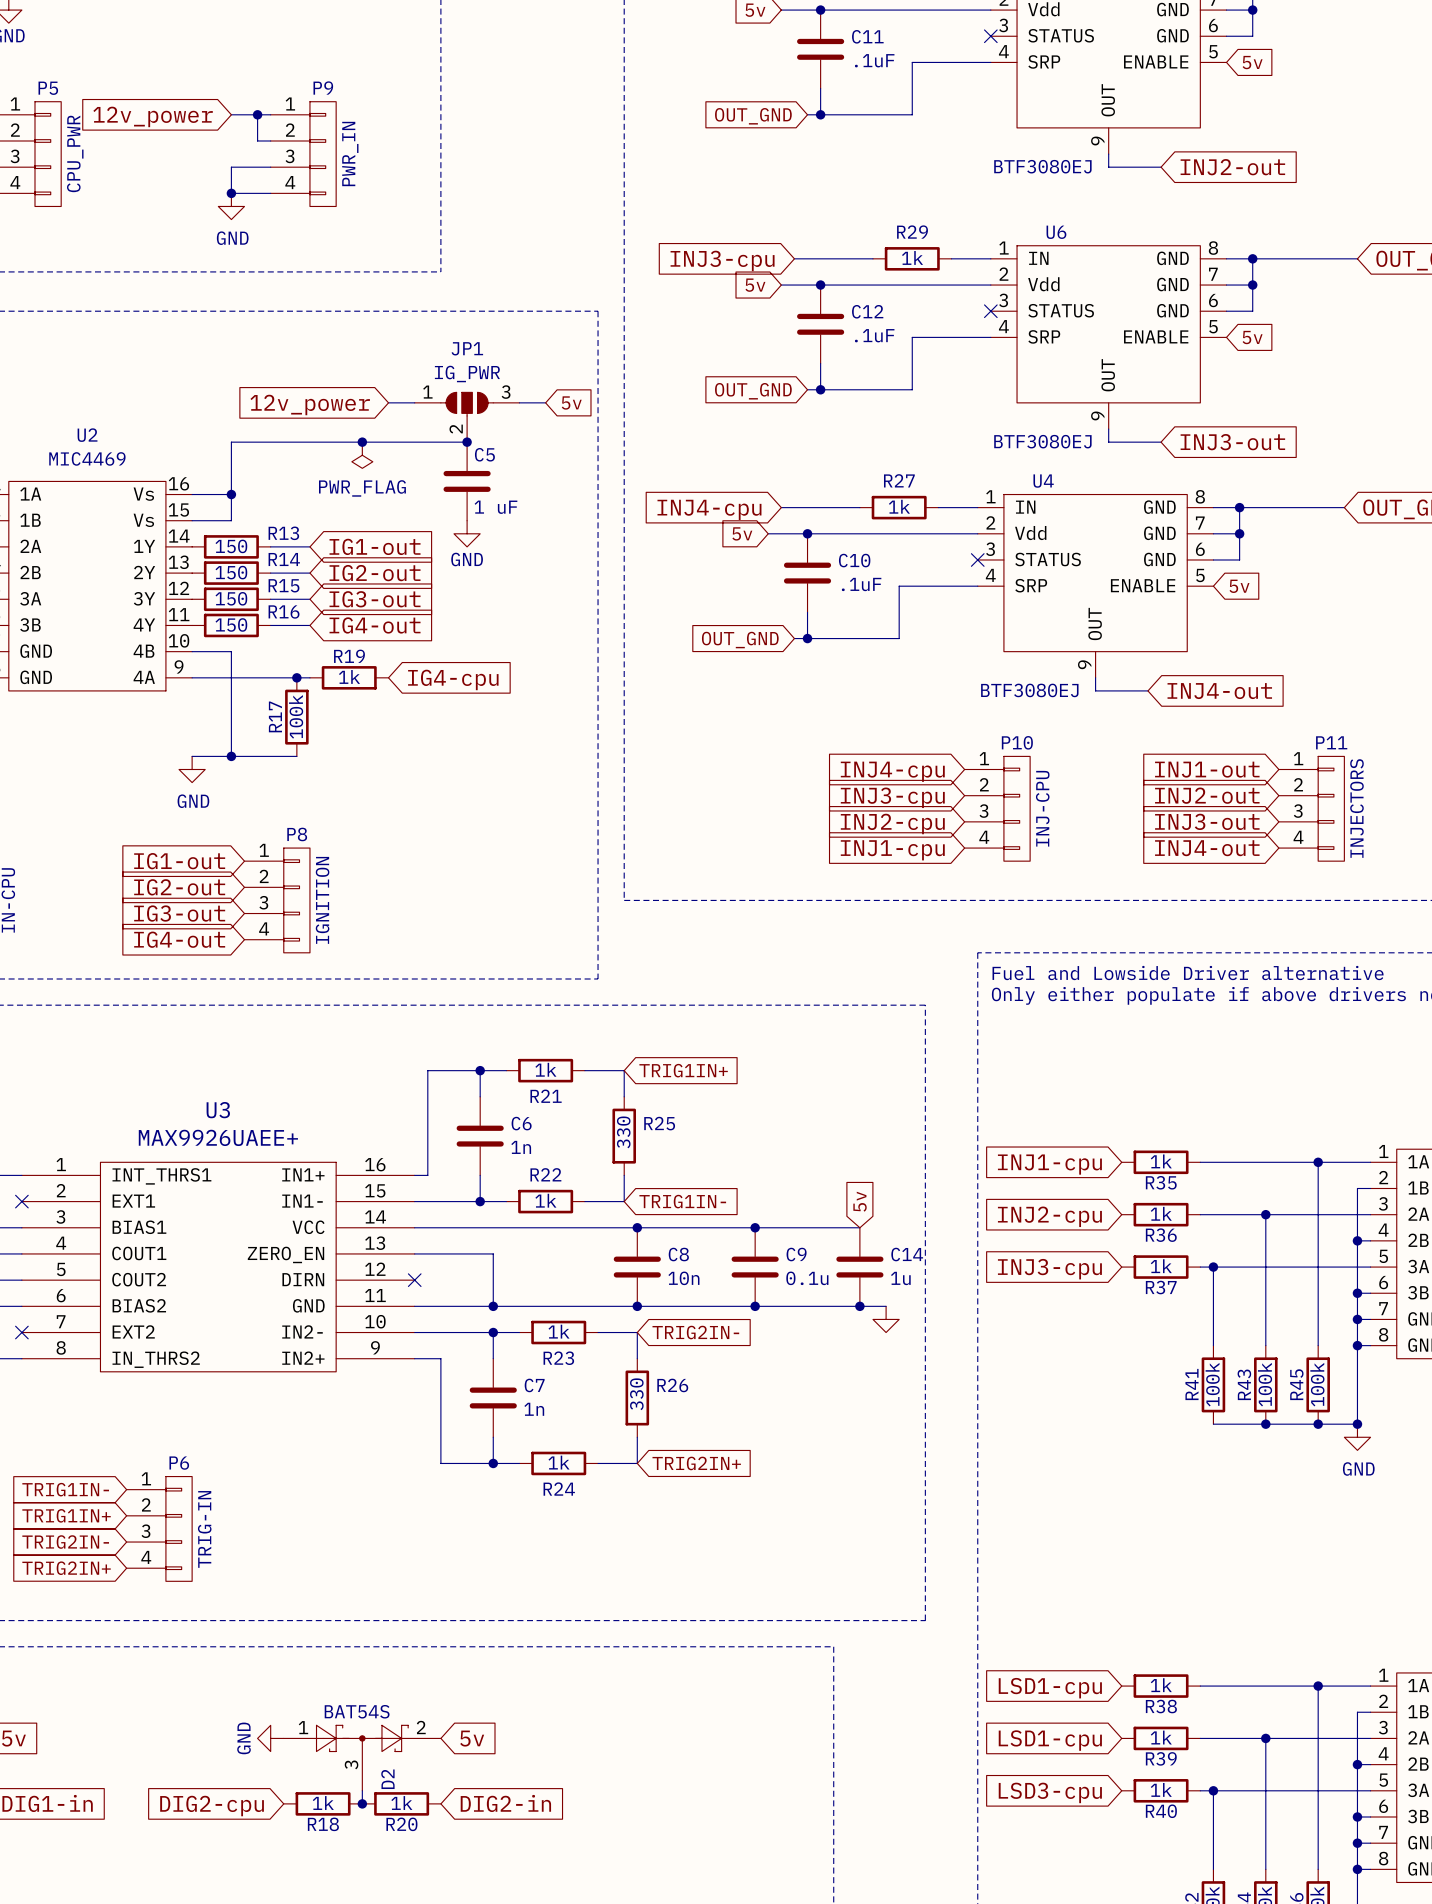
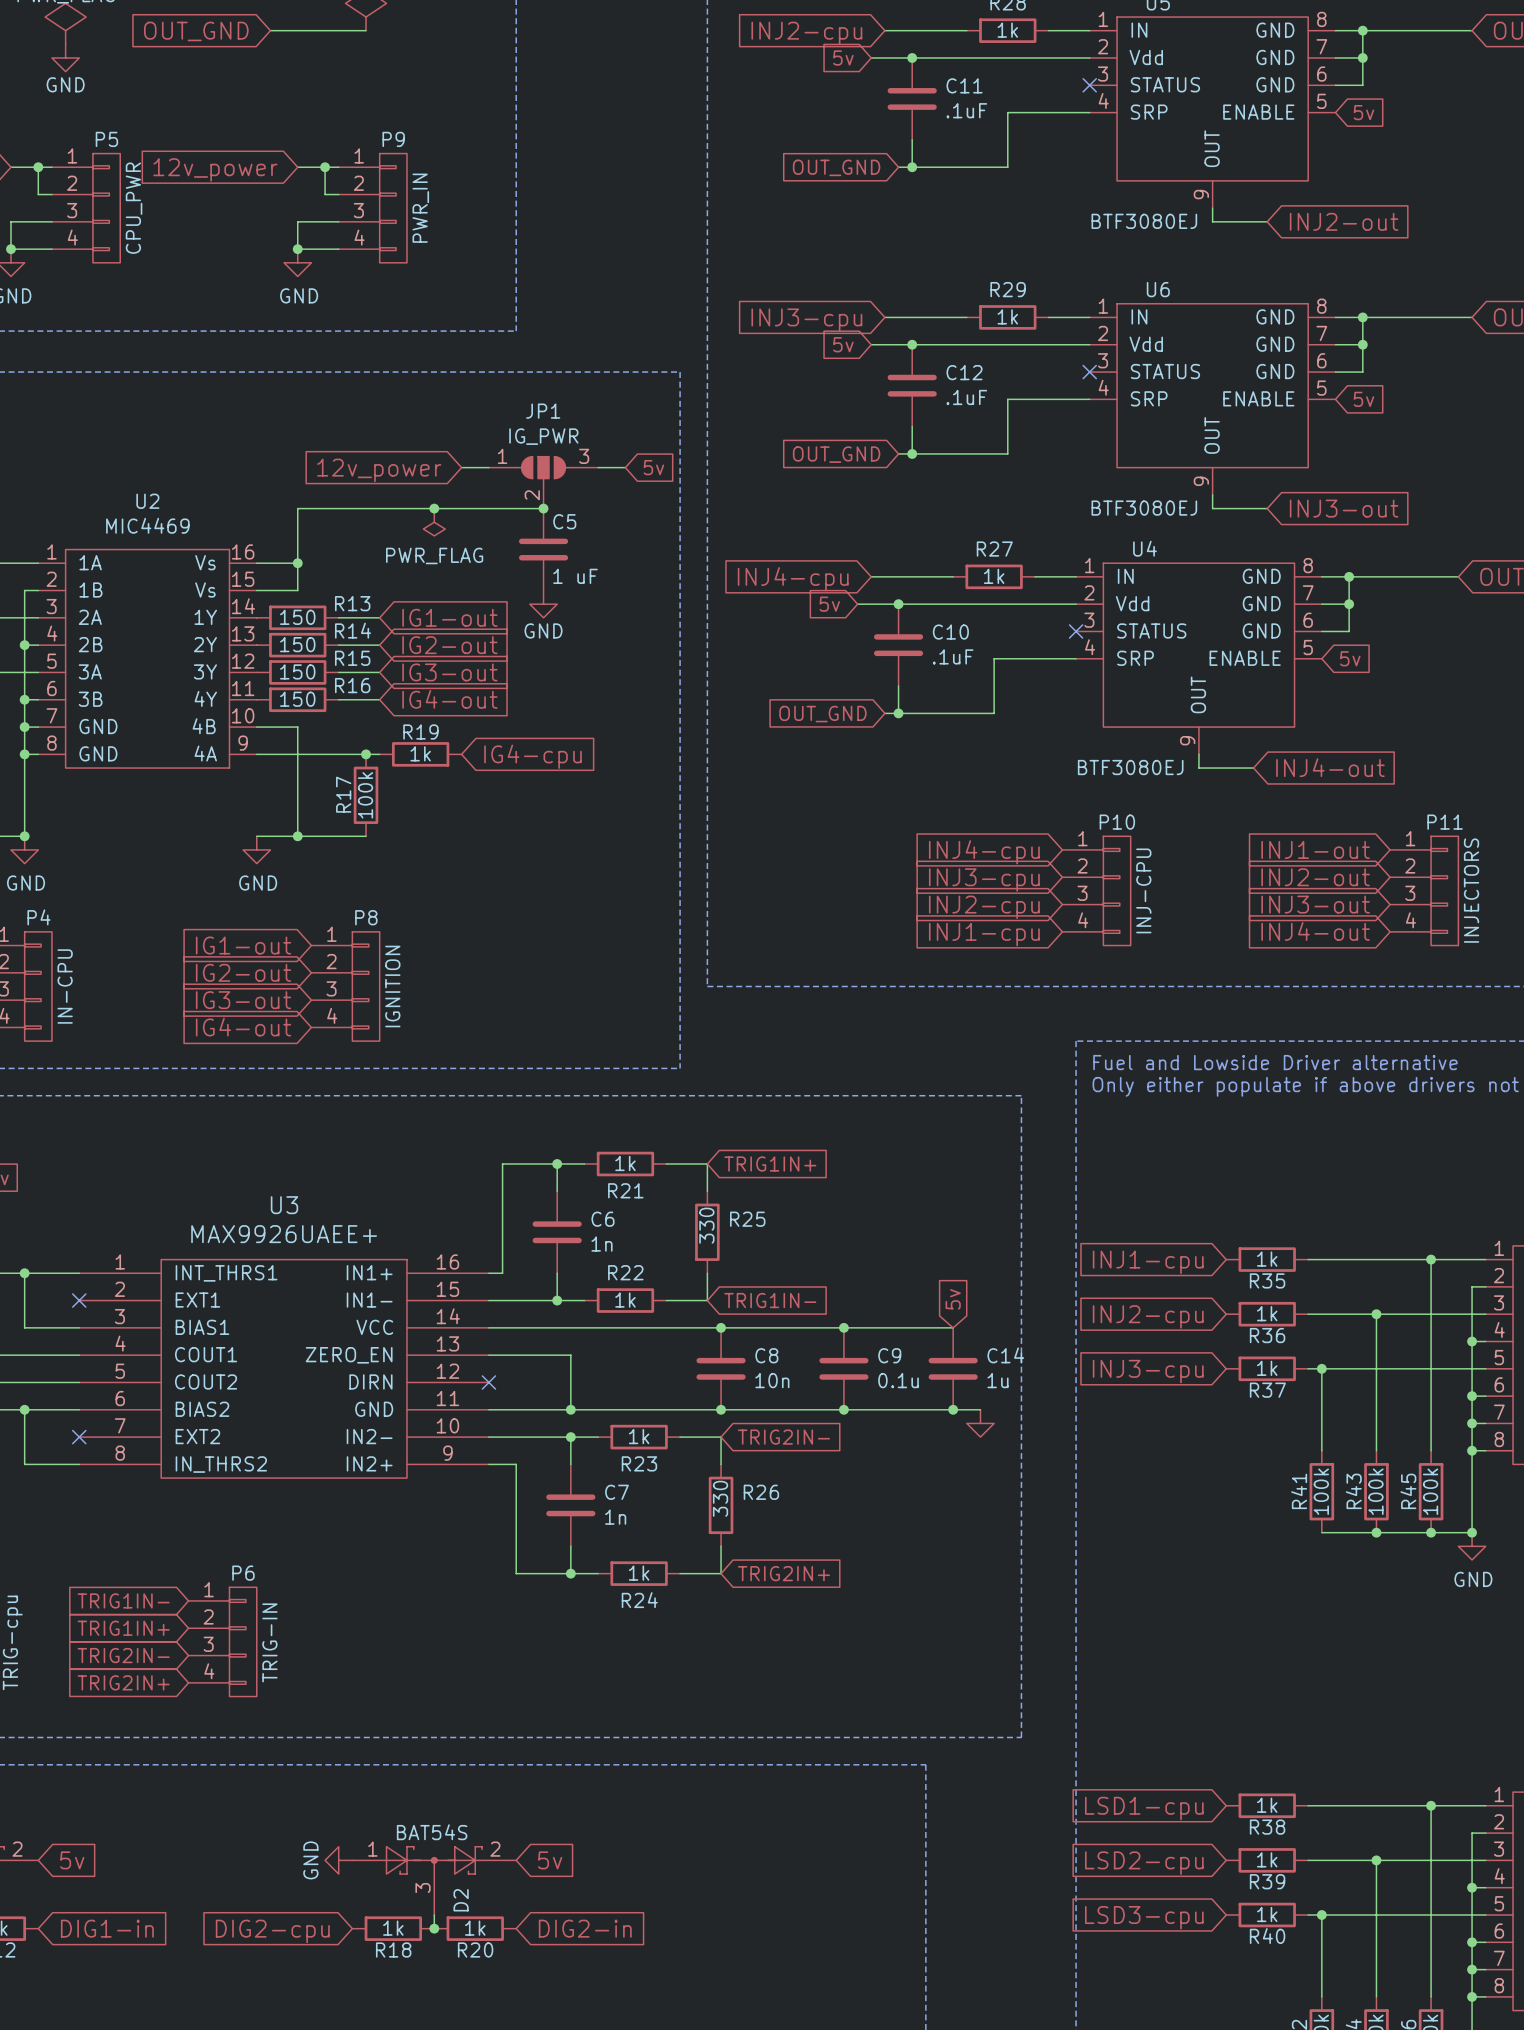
global label: LSD1-cpu (1050, 1740) -> LSD2-cpu (1144, 1863)

